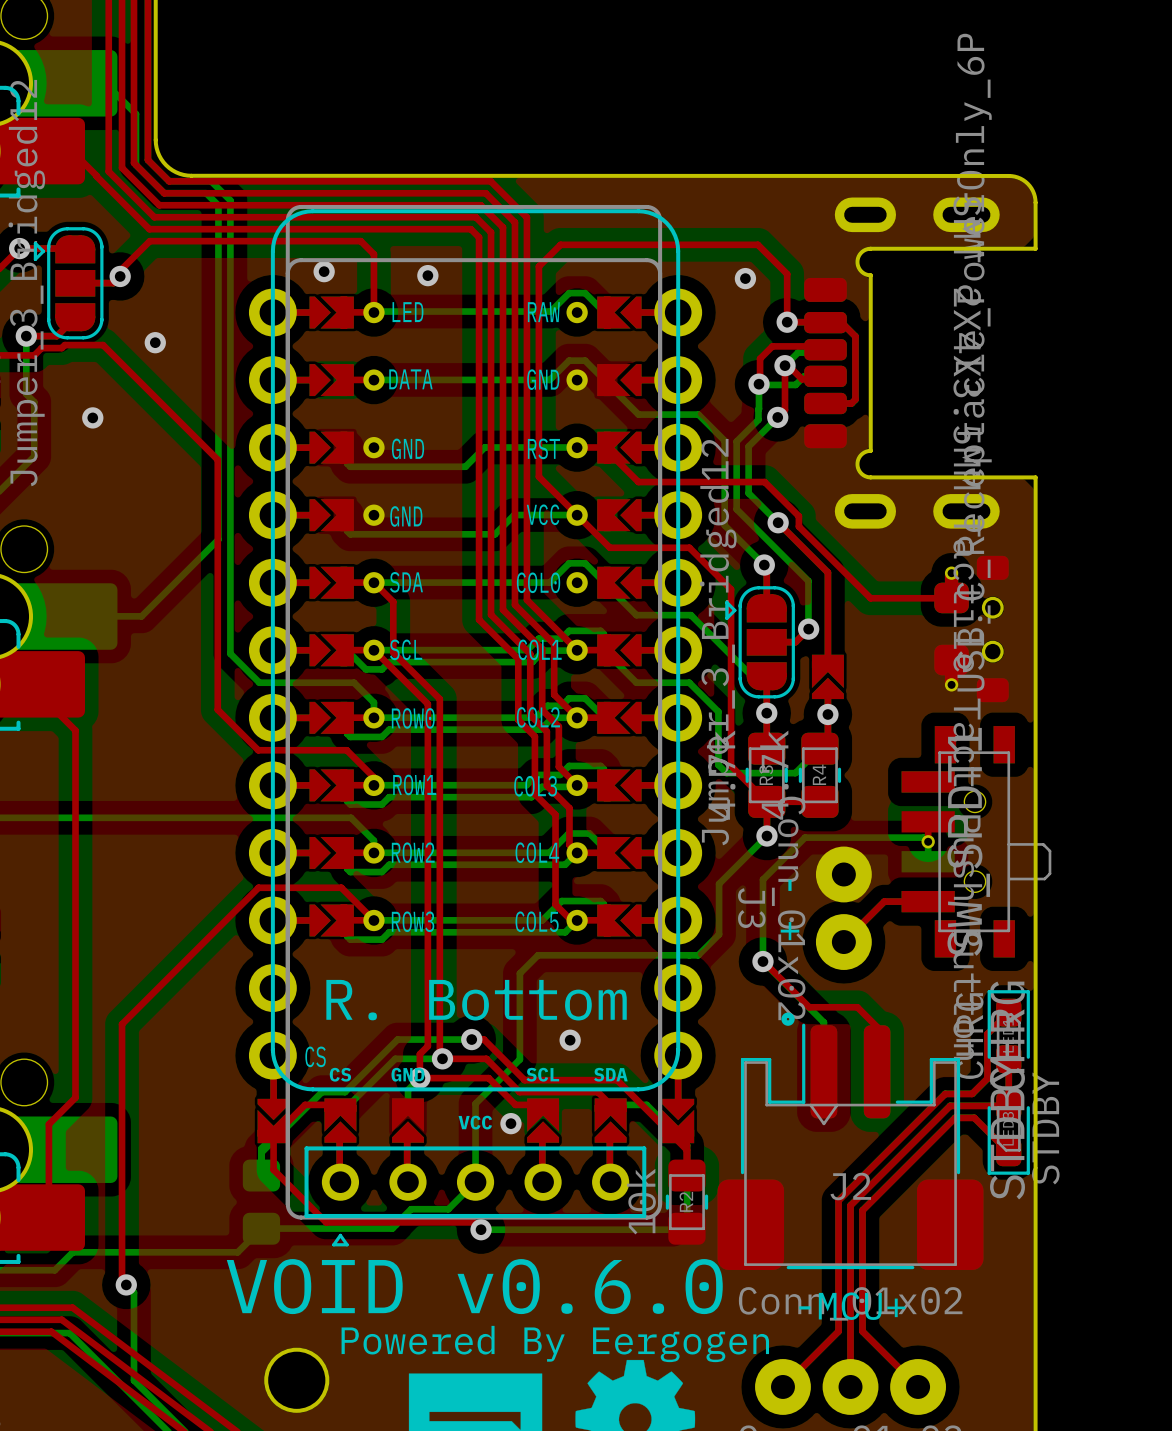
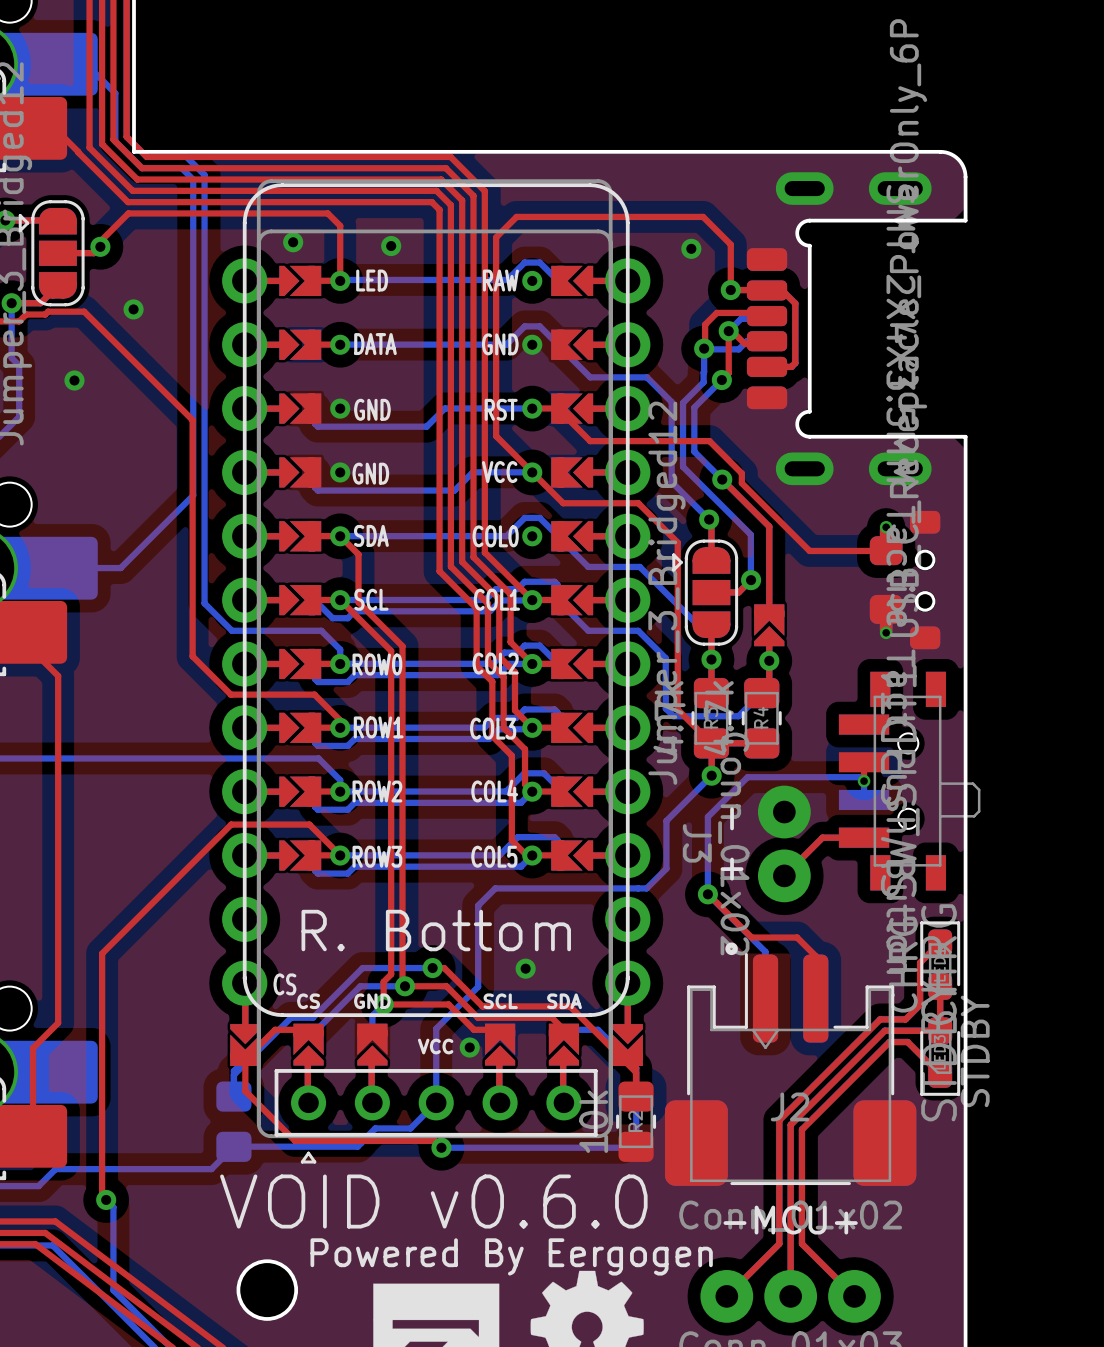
board edge: (155, 139) (157, 151) (166, 165) (175, 172) (191, 175) (1008, 175) -> (133, 117) (133, 151) (940, 151)

